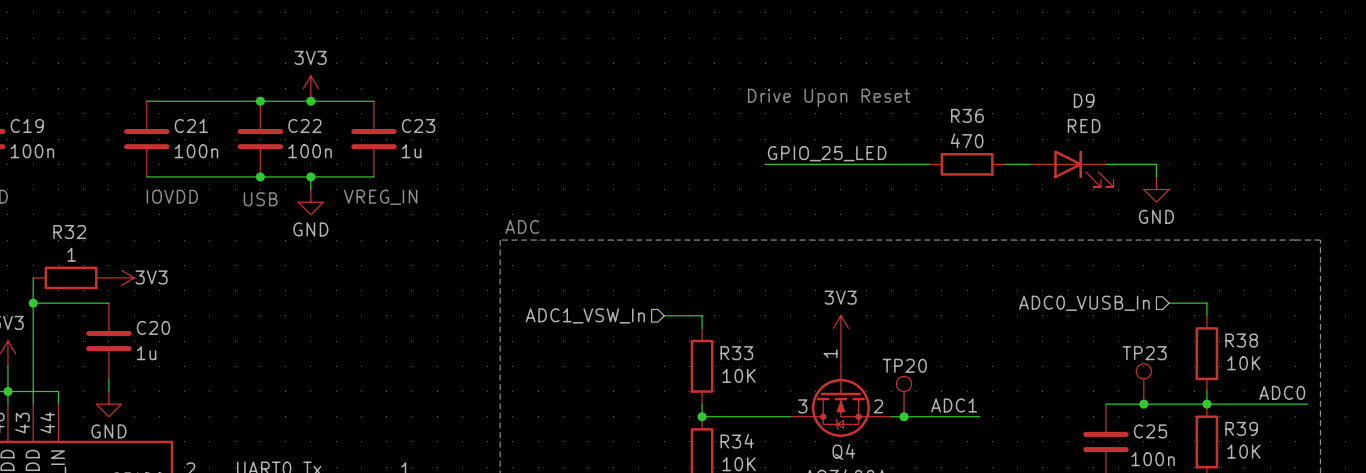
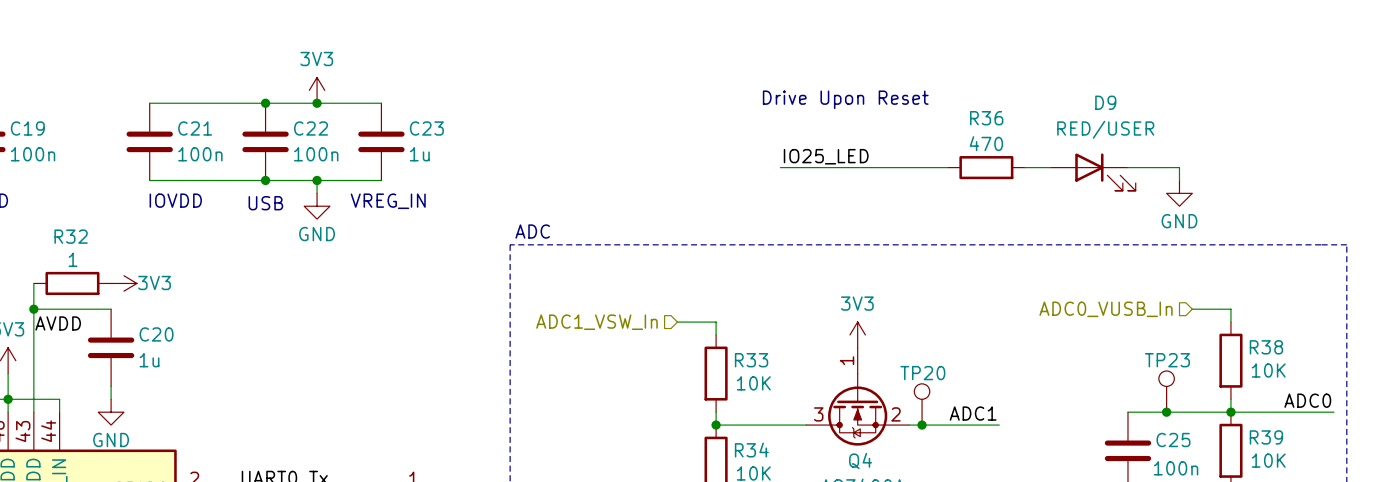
D9 value: RED (1084, 126) -> RED/USER (1105, 129)
label: GPIO_25_LED (827, 153) -> IO25_LED (826, 156)
label: none -> AVDD (58, 323)

